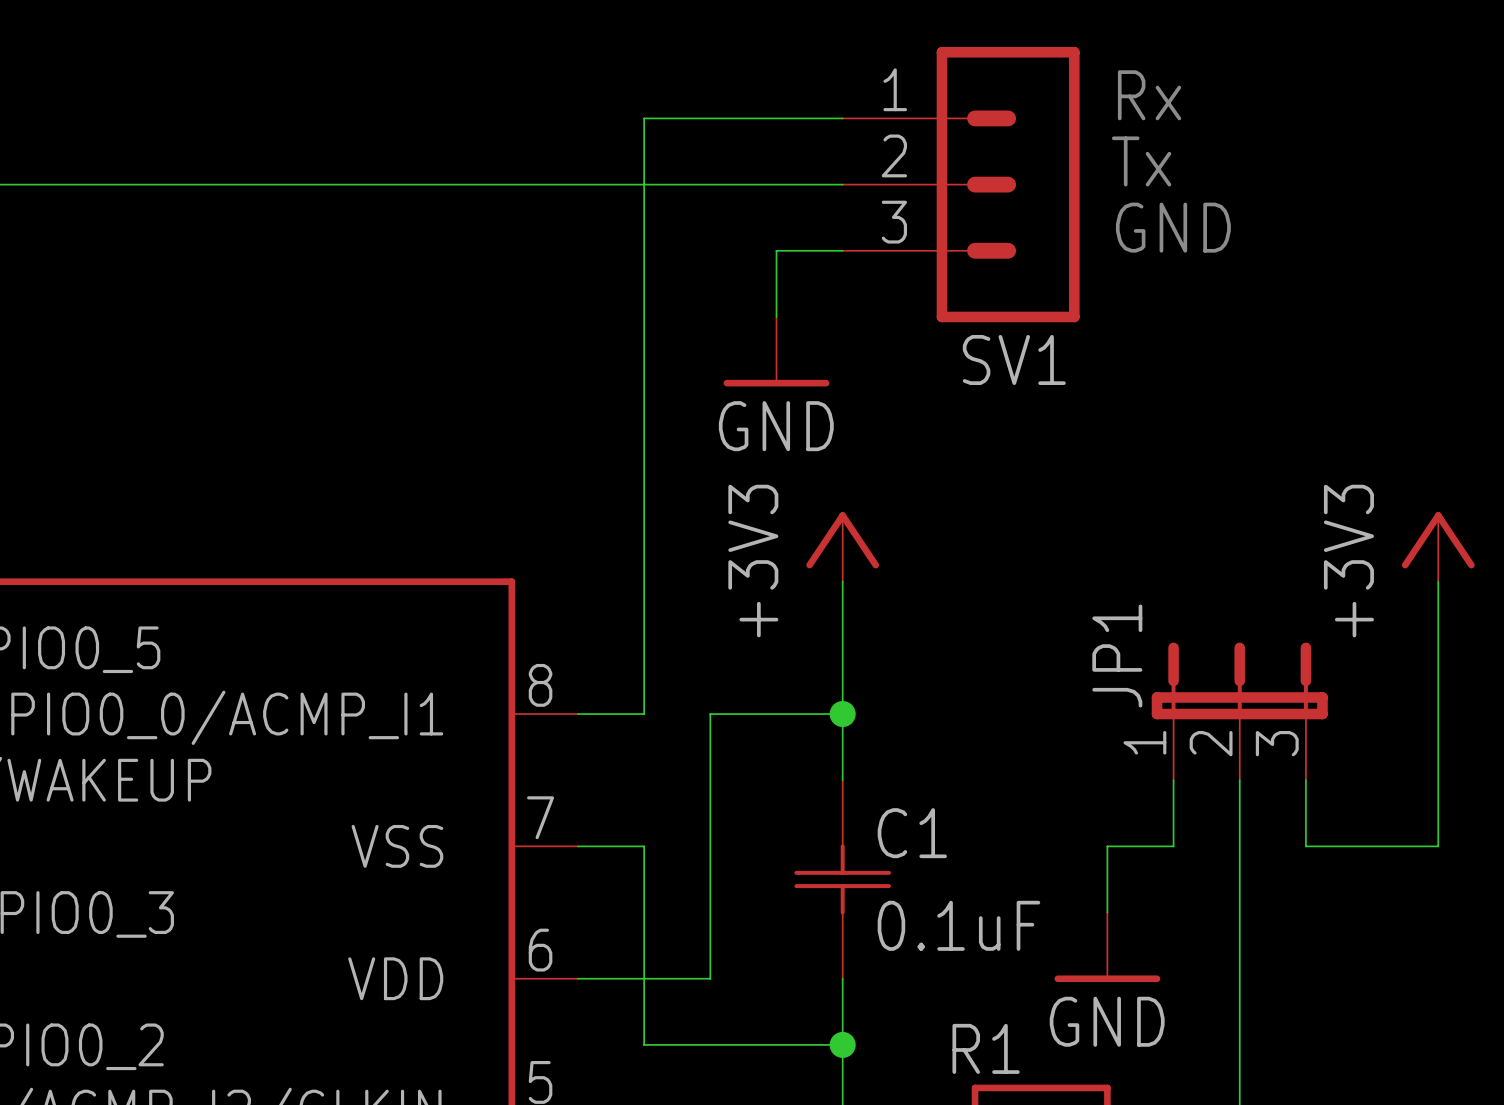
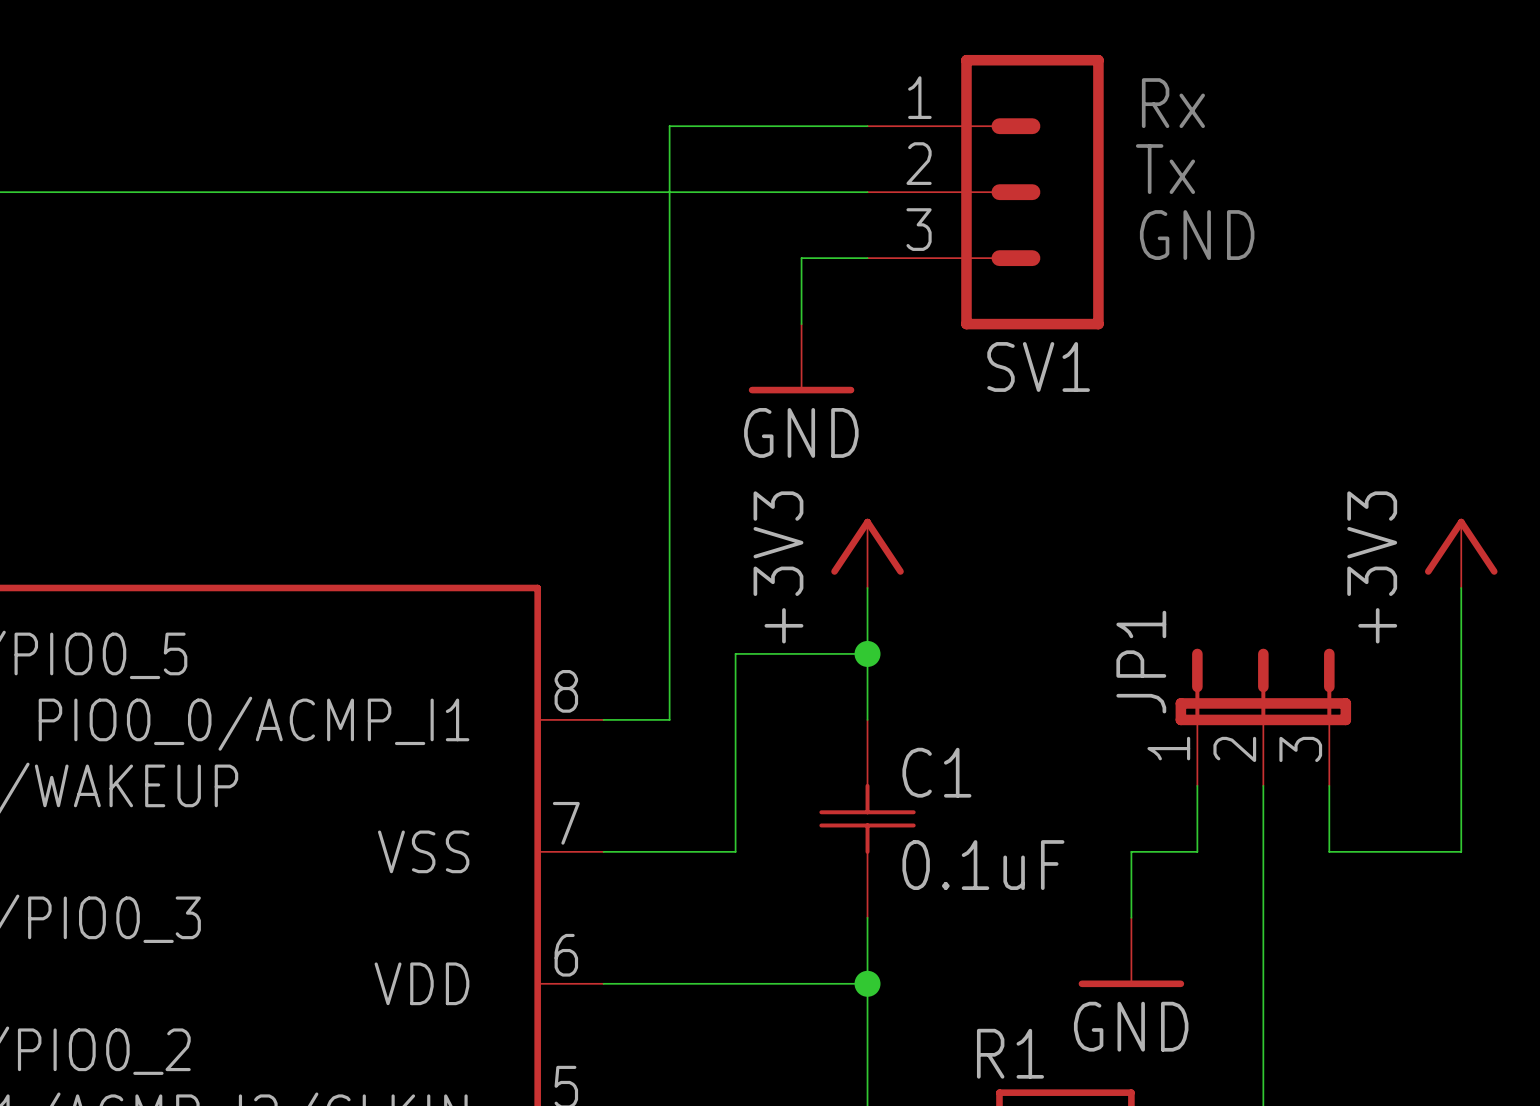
wire: (710, 714) (842, 714) (842, 780) -> (735, 719) (735, 653) (867, 653)
junction position: (842, 714) -> (867, 653)
wire: (644, 846) (644, 1044) (842, 1044) -> (669, 851) (735, 851)
wire: (710, 846) (710, 978) -> (867, 917) (867, 983) (735, 983)
C1 position: (842, 879) -> (867, 818)
junction position: (842, 1044) -> (867, 983)

